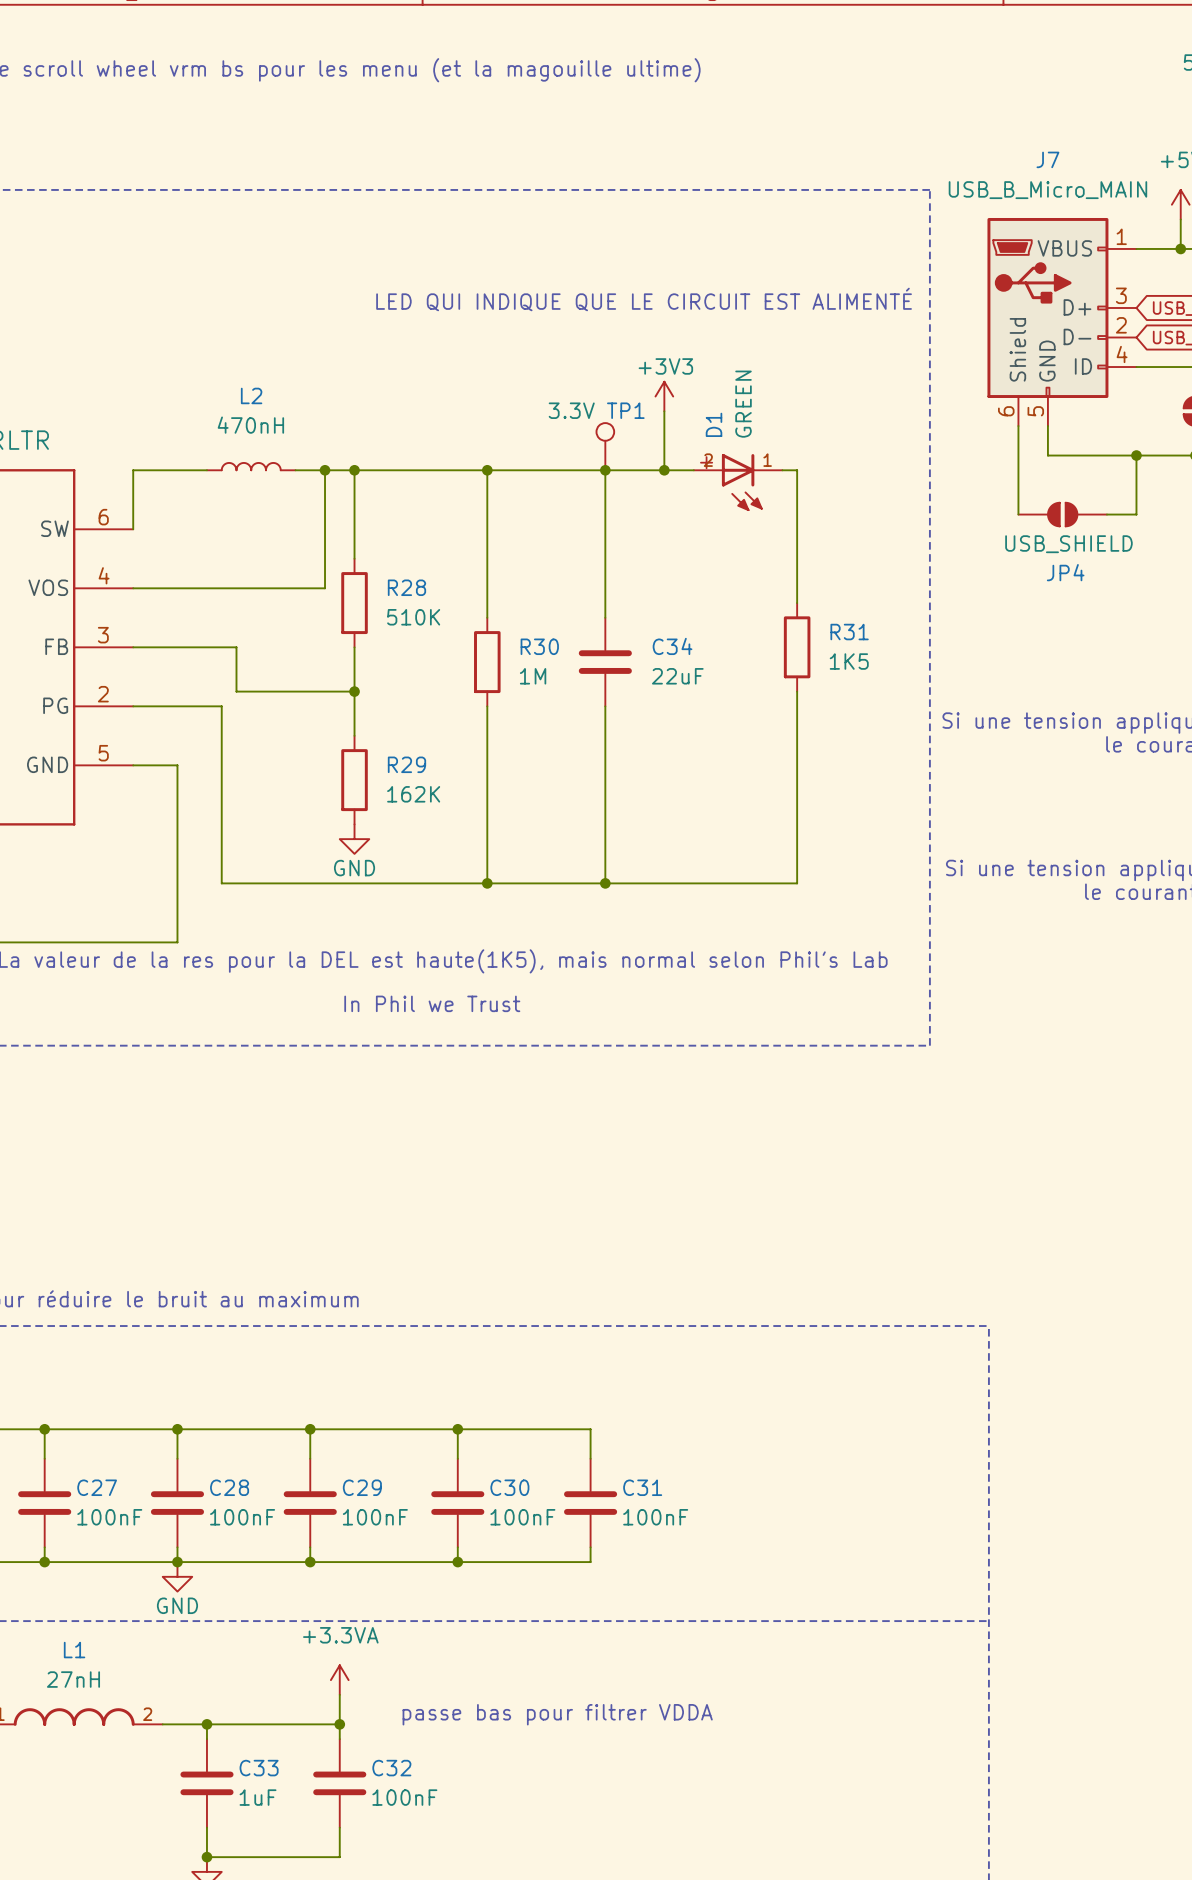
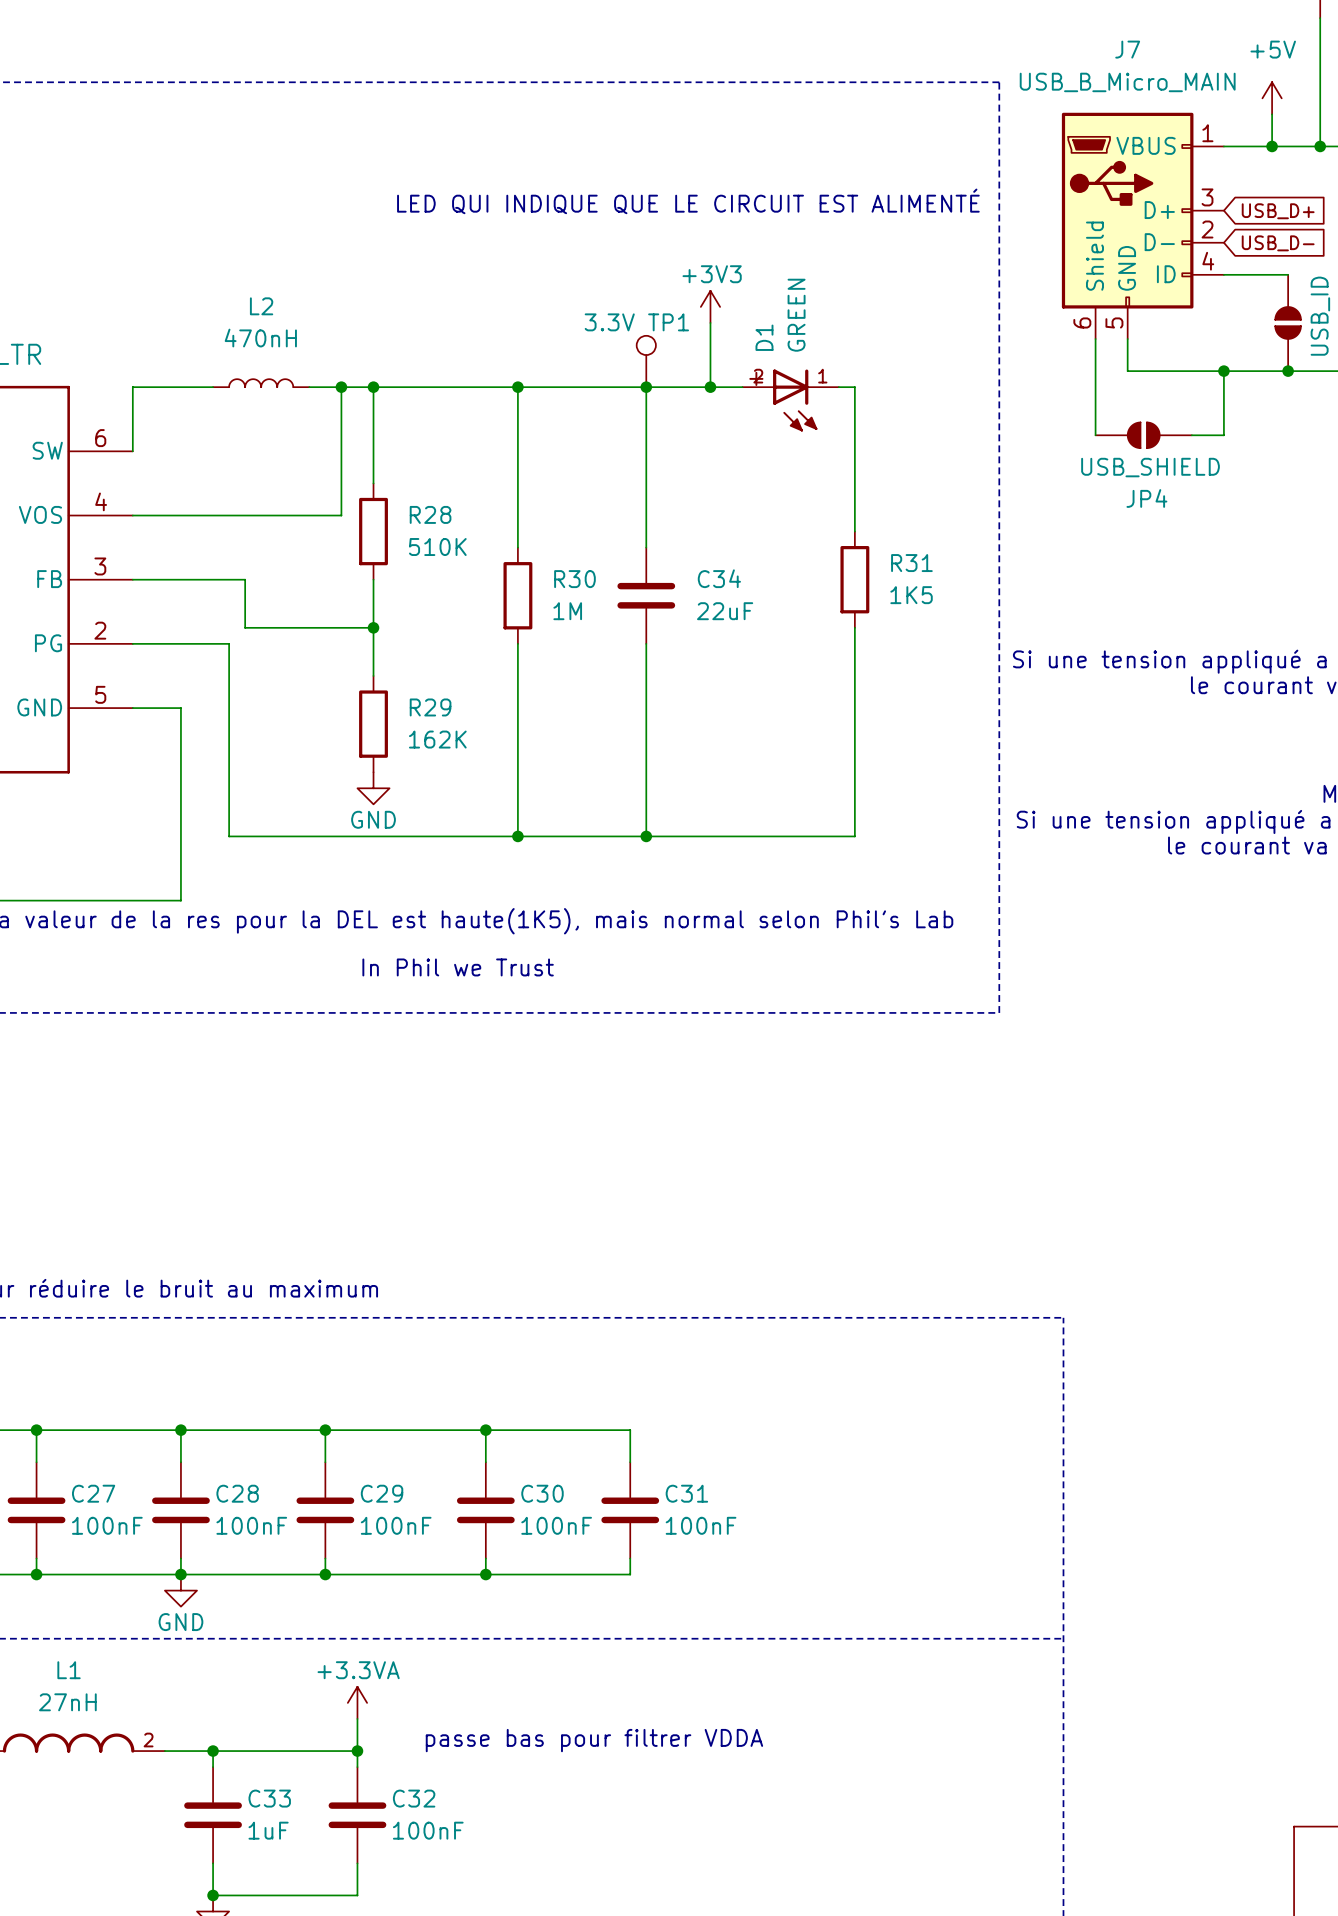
power symbol text position: +3.3VA (340, 1635) -> +3.3VA (358, 1670)

